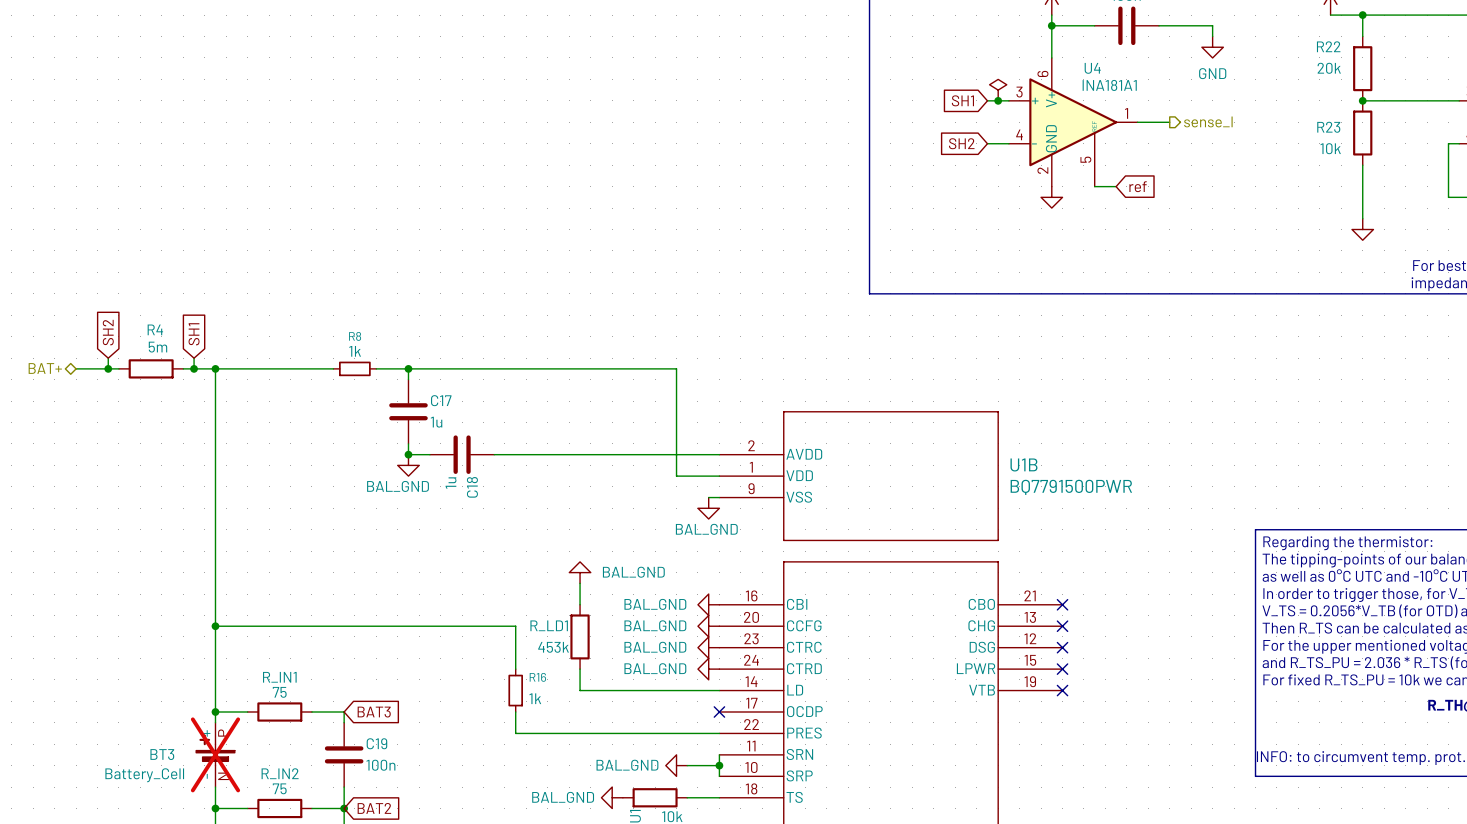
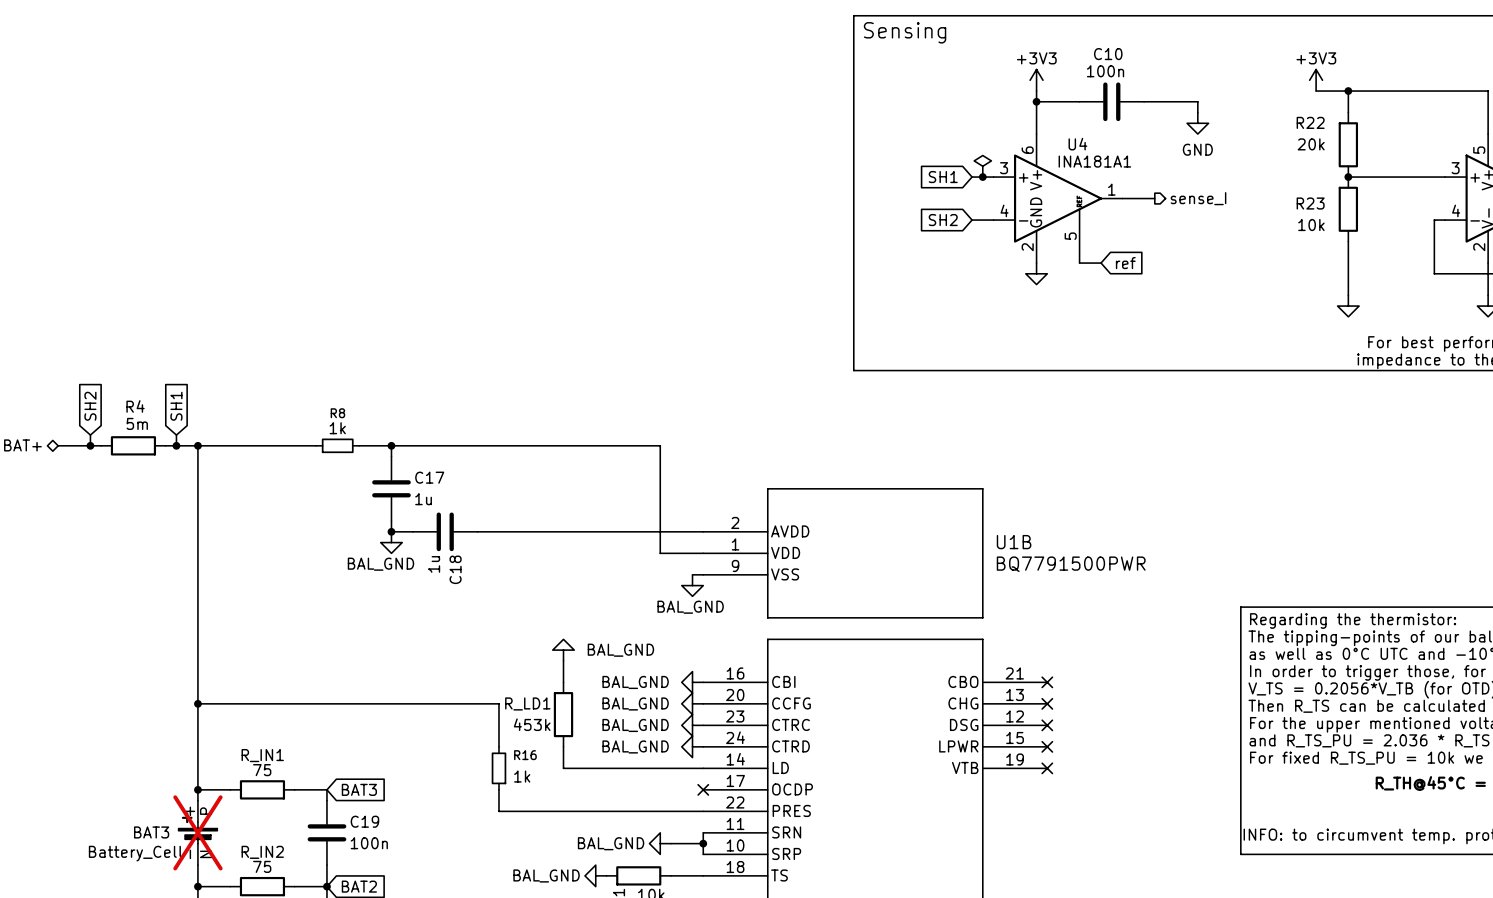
BT3 name: BT3 (162, 754) -> BAT3 (151, 832)

